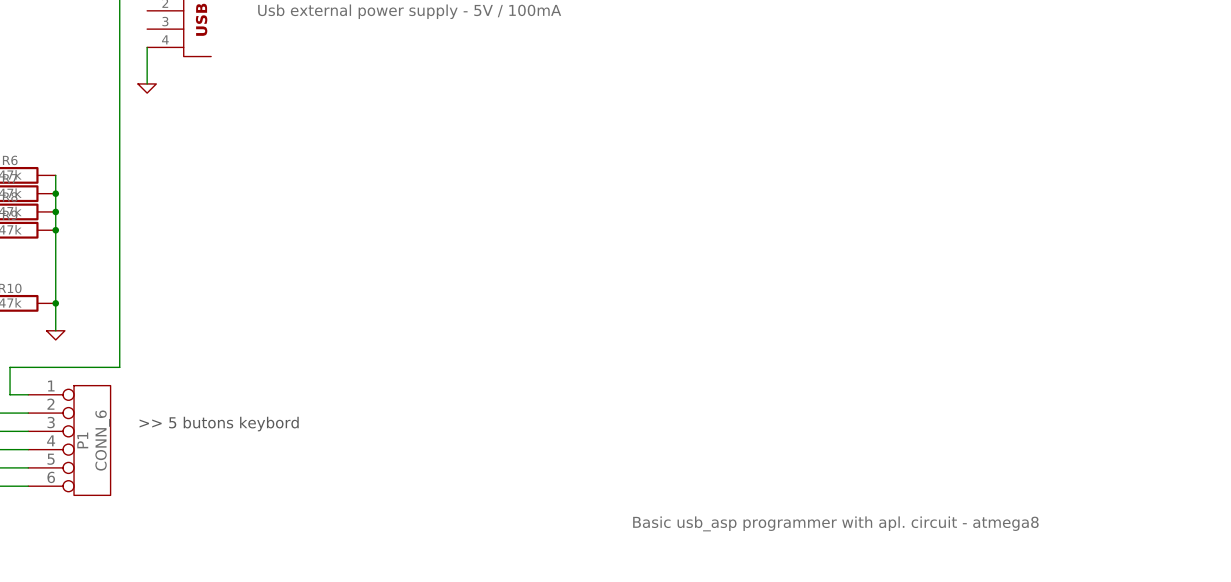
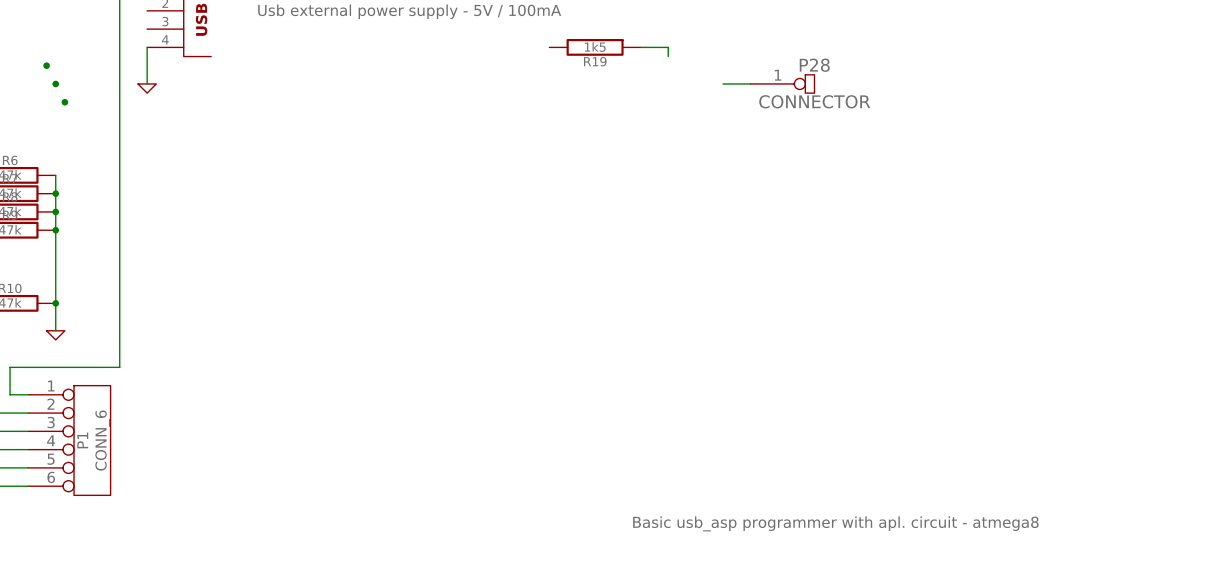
R19: none -> 1k5 (595, 47)
wire: none -> (640, 47) (668, 47) (668, 56)
junction: none -> (46, 65)
junction: none -> (55, 83)
wire: none -> (723, 83) (750, 83)
P28: none -> CONNECTOR (782, 83)
junction: none -> (64, 102)
text: >> 5 butons keybord (219, 424) -> none

